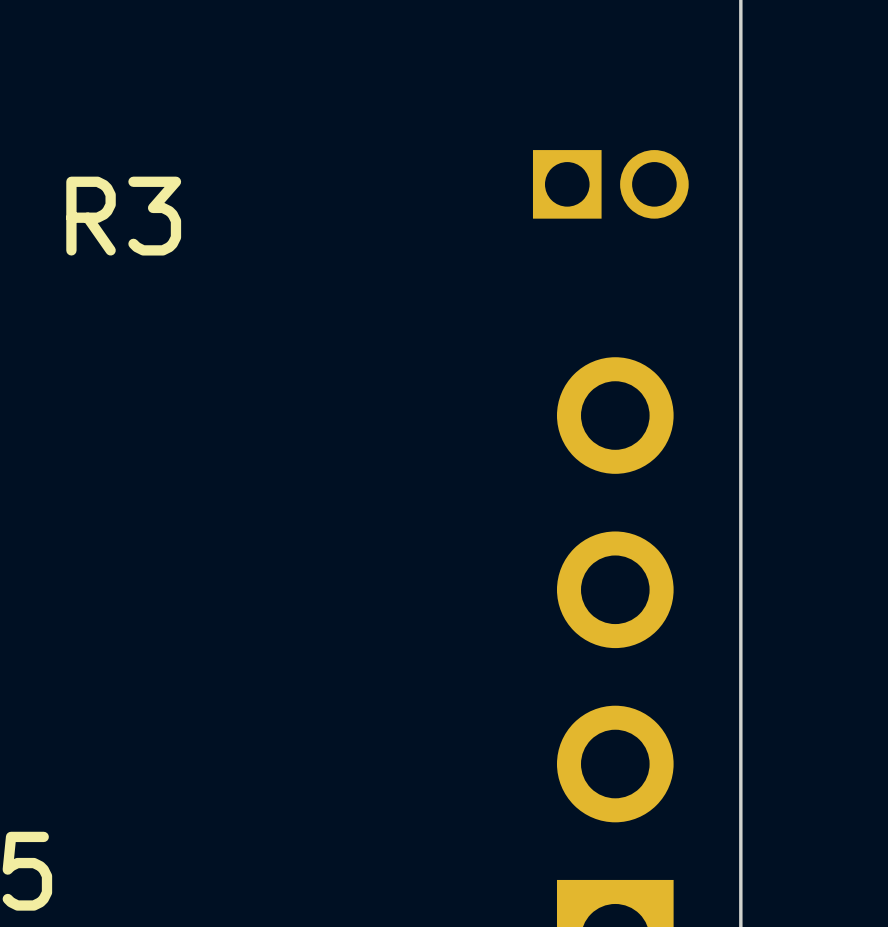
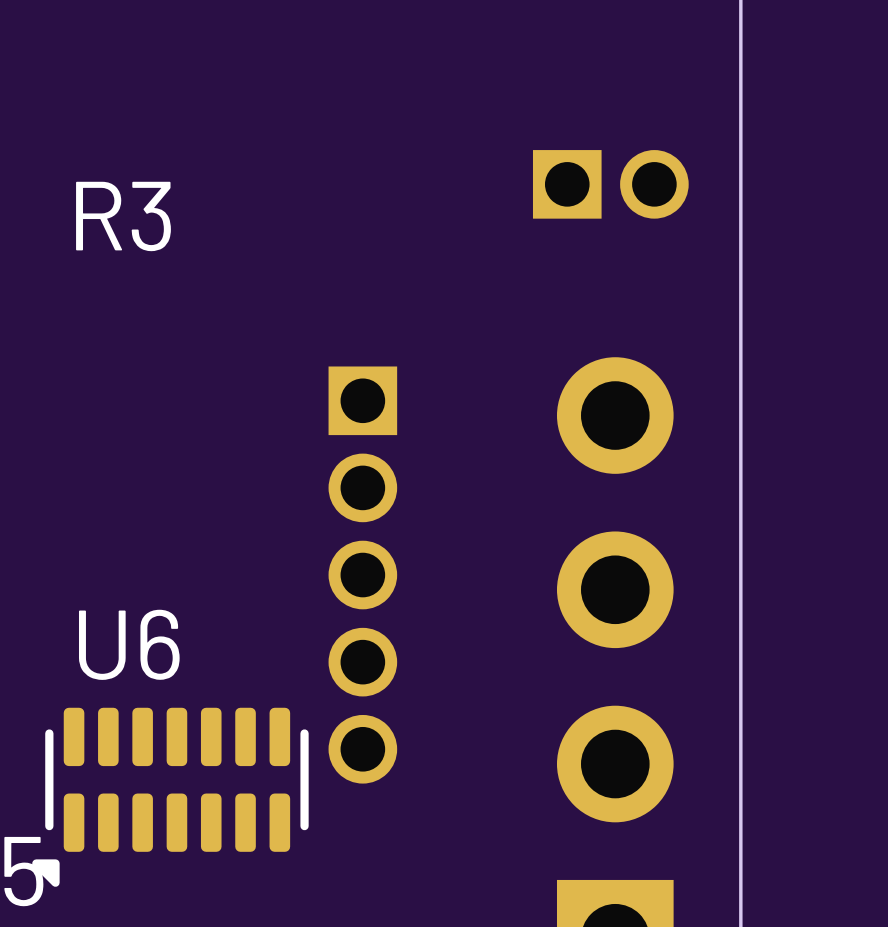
part: none -> (362, 575)
U6: none -> (170, 797)

